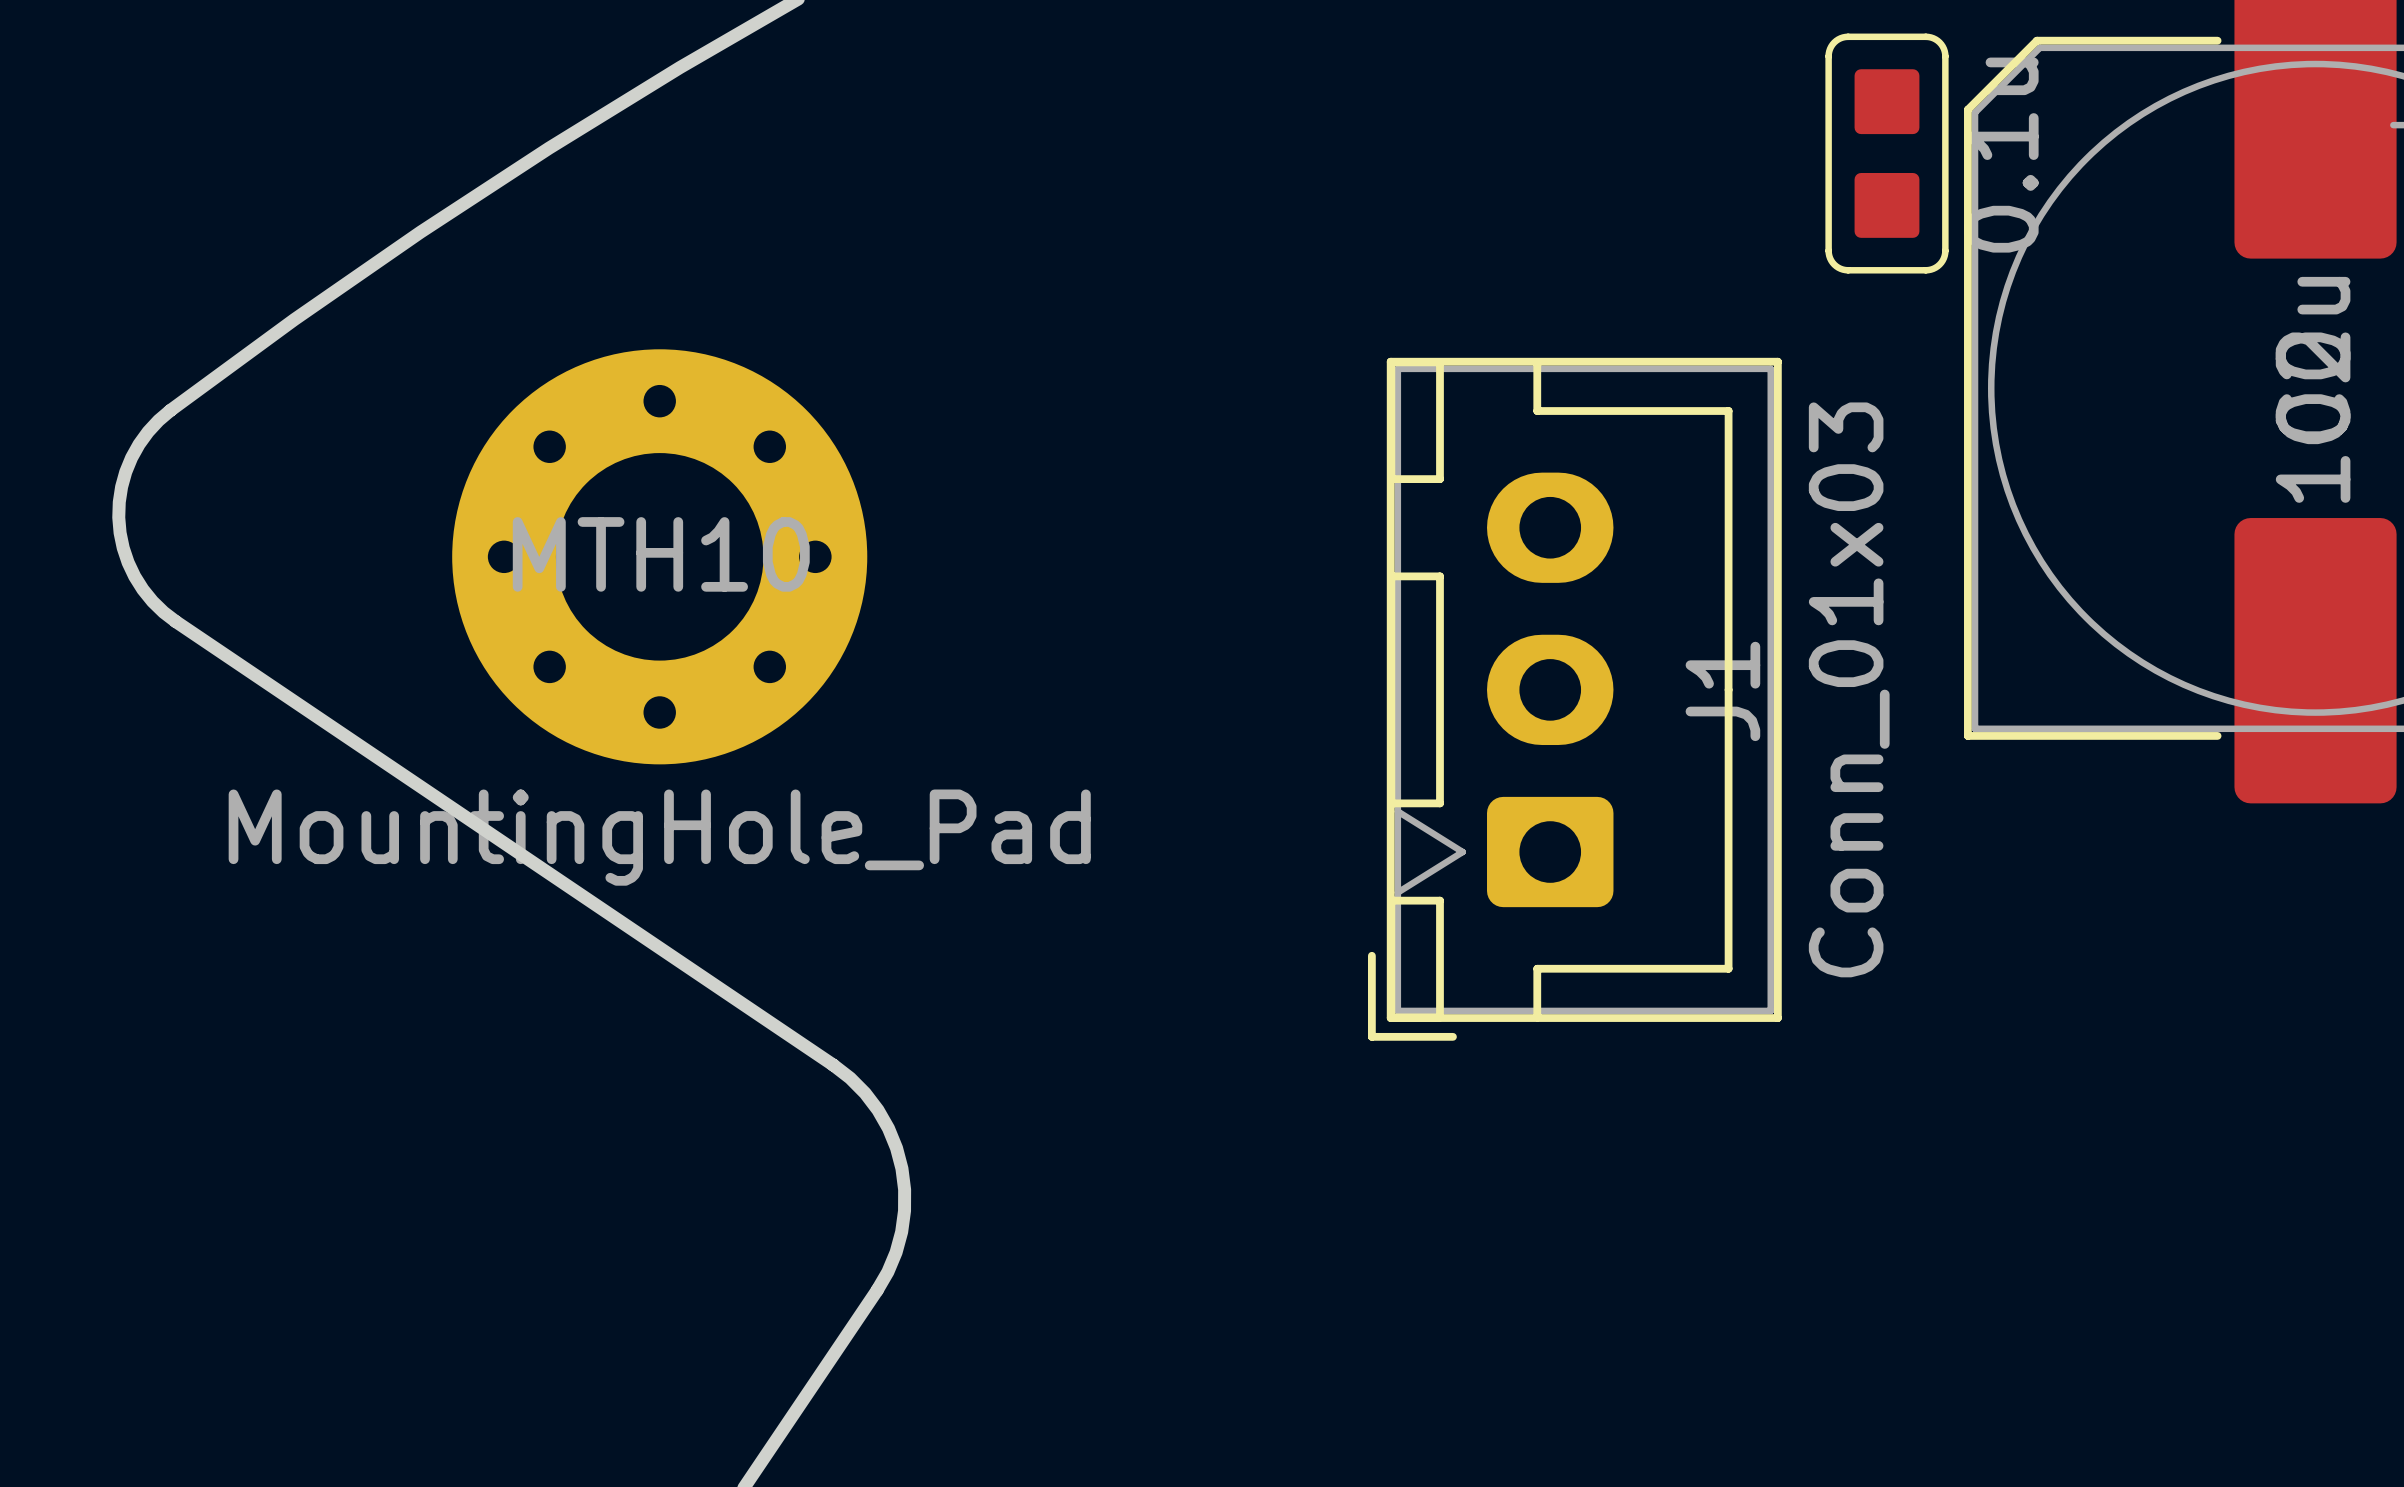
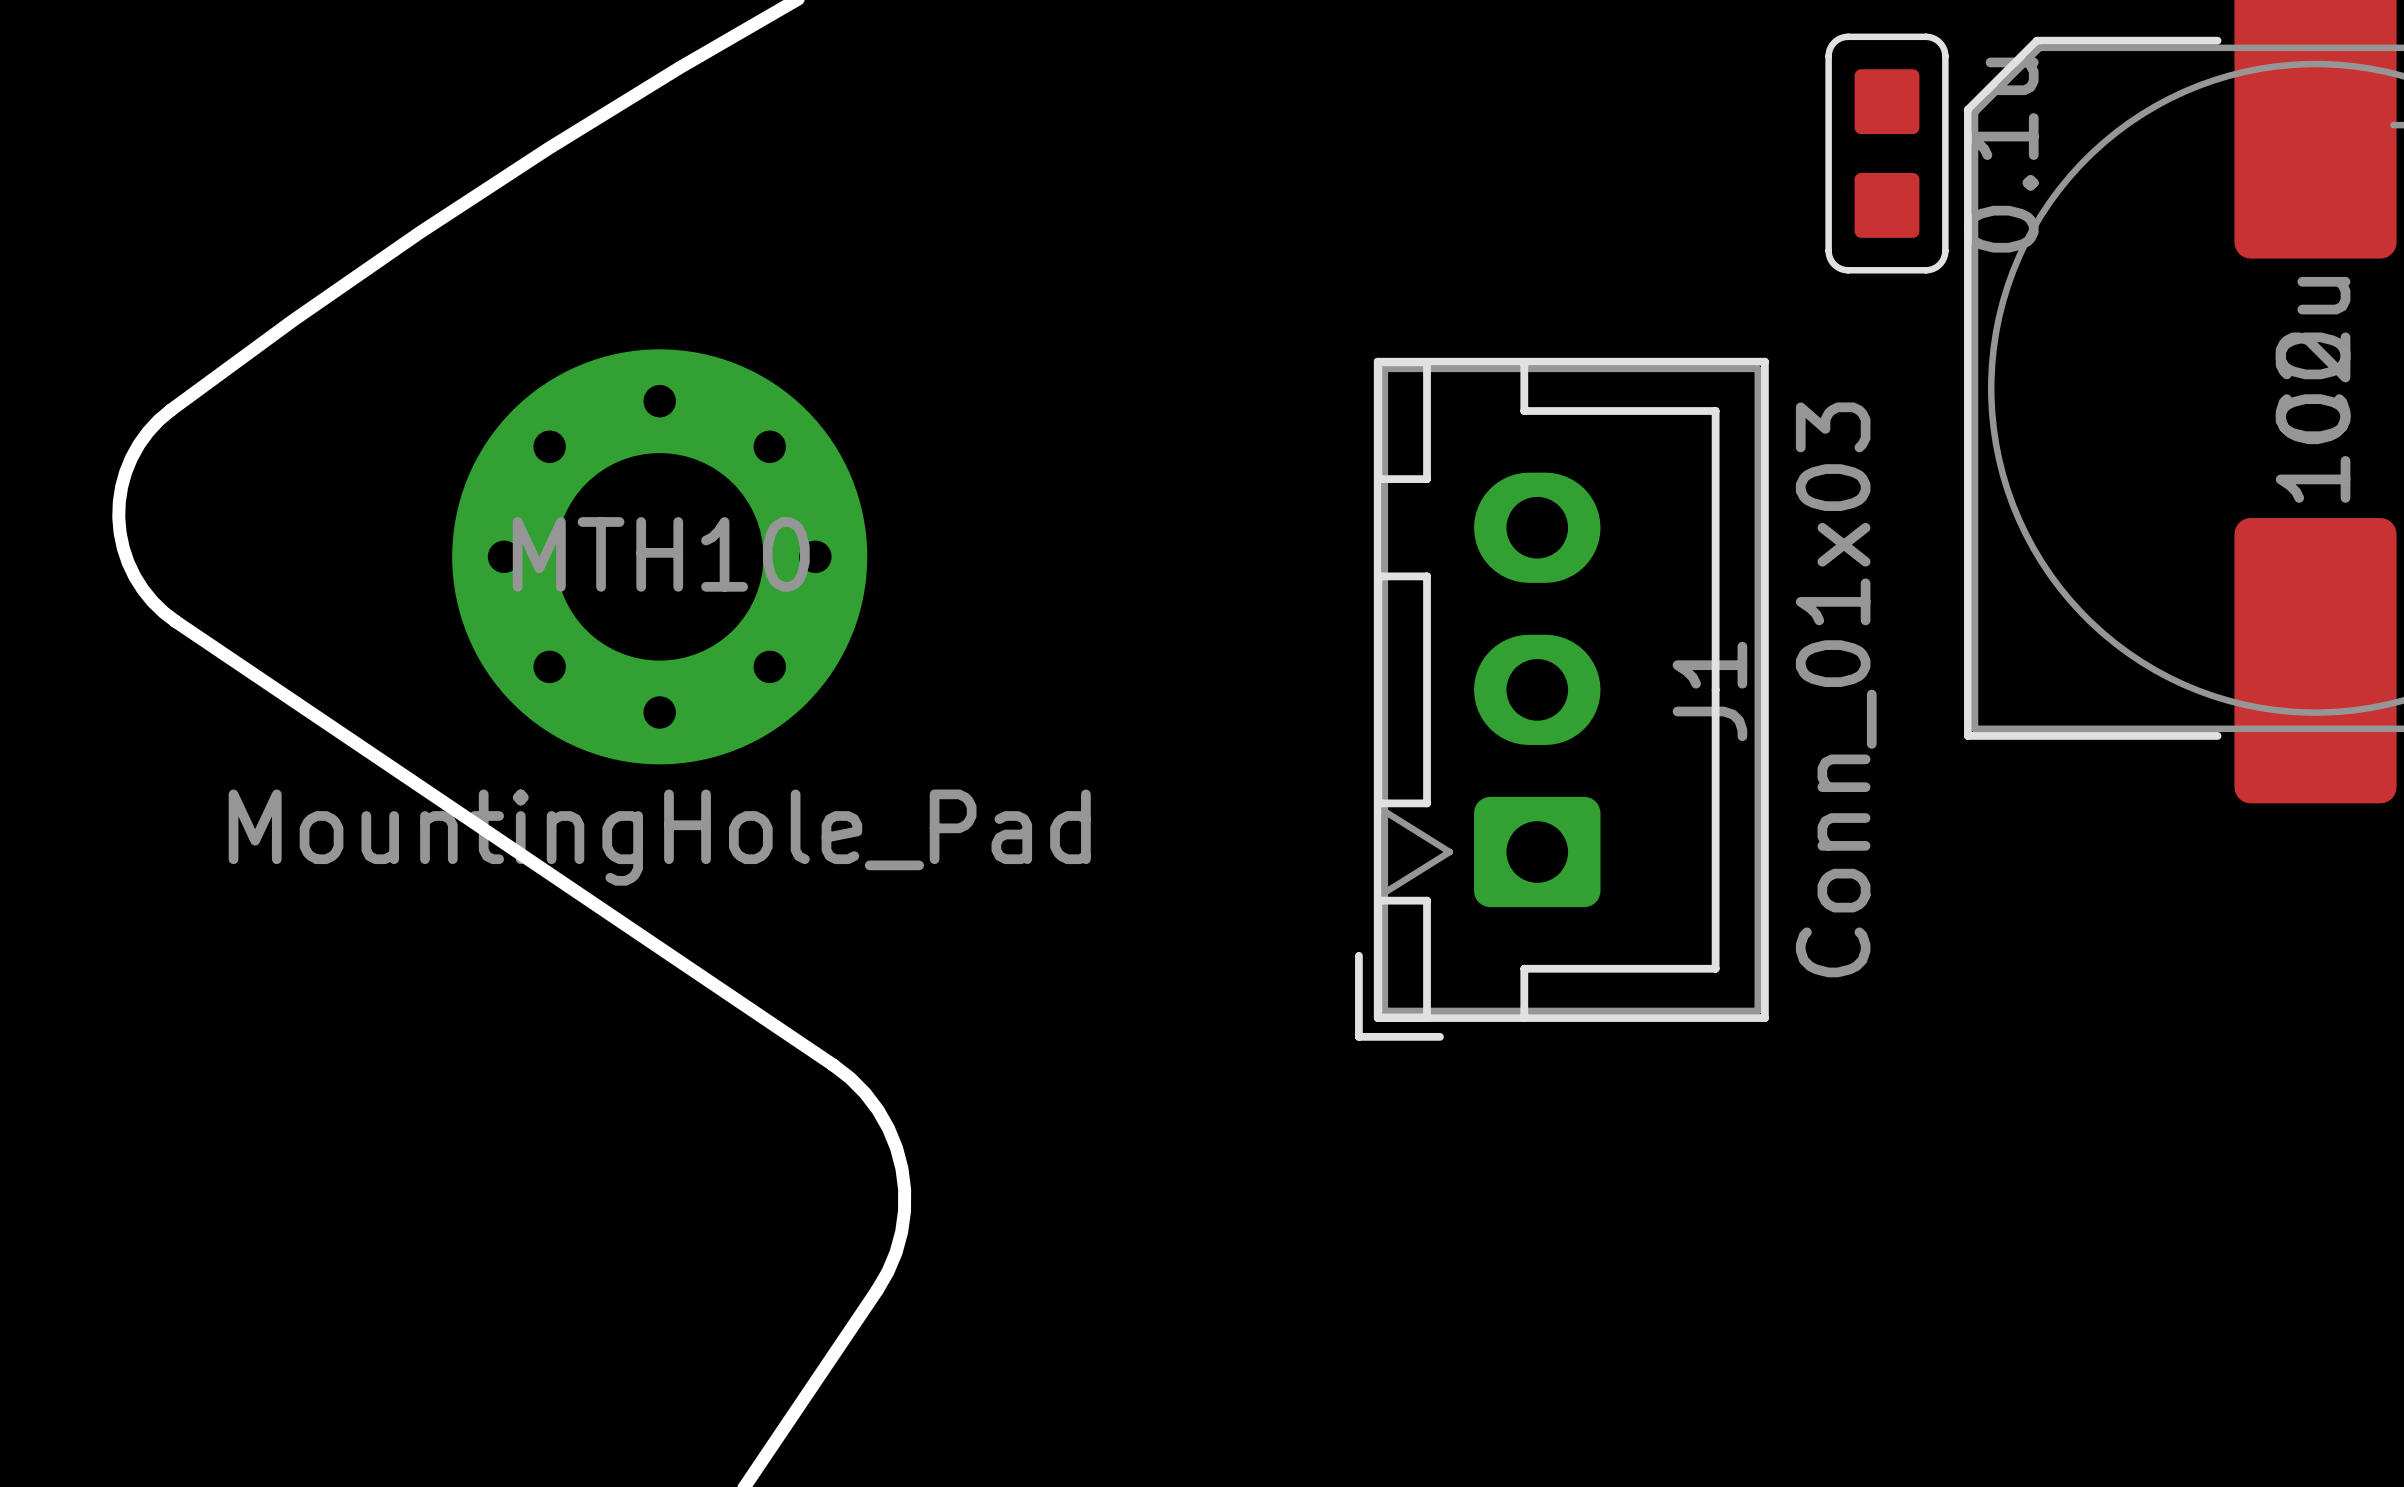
J1 position: (1574, 699) -> (1561, 699)

